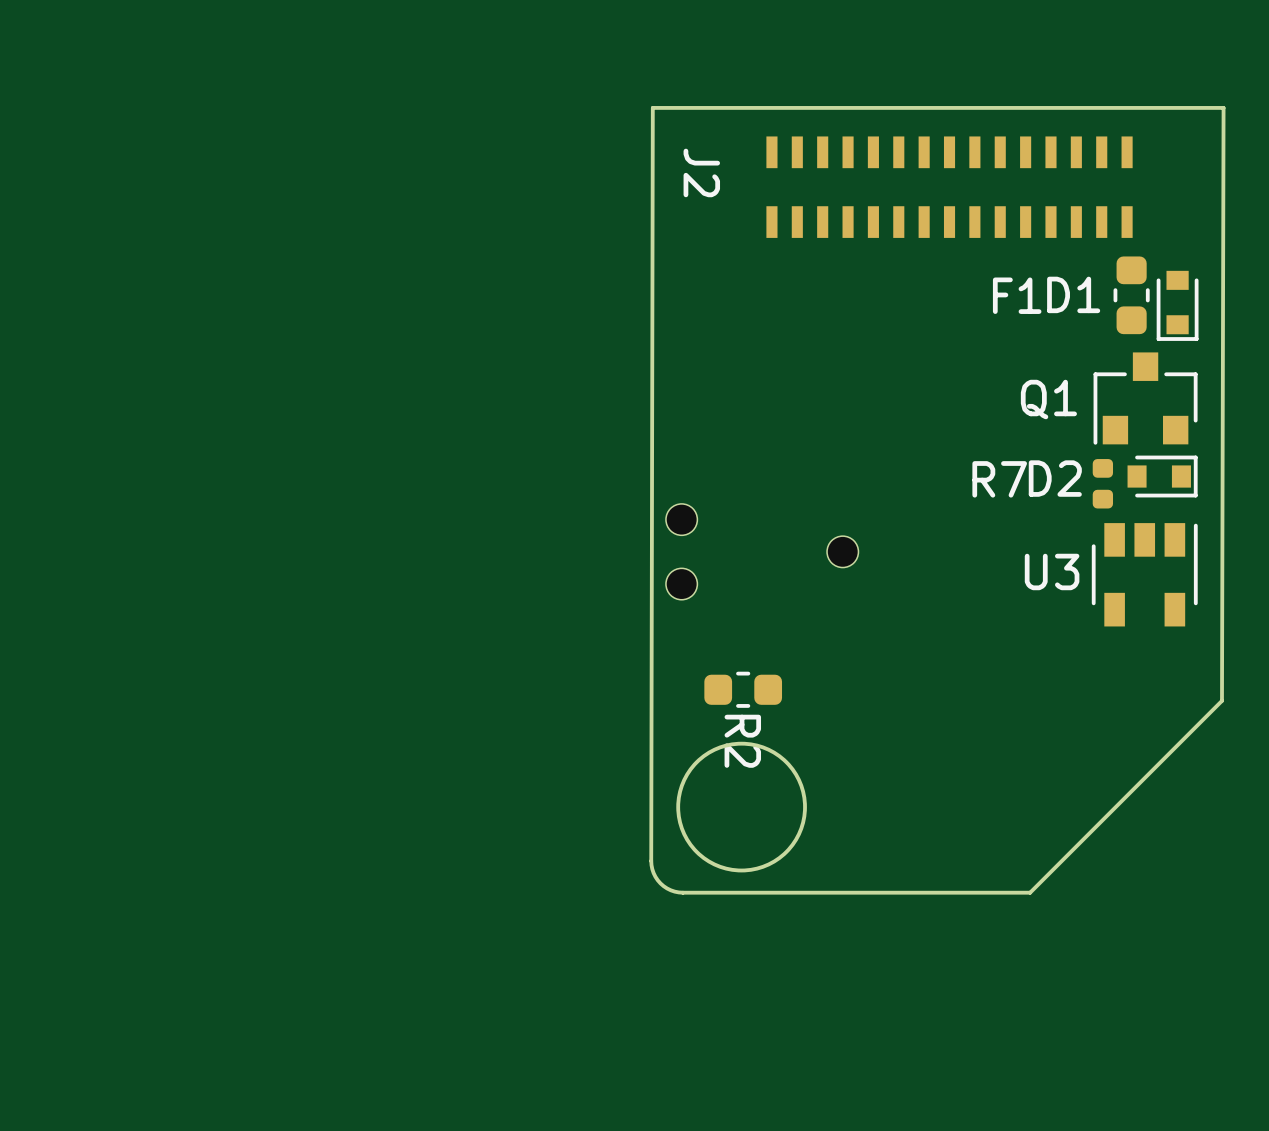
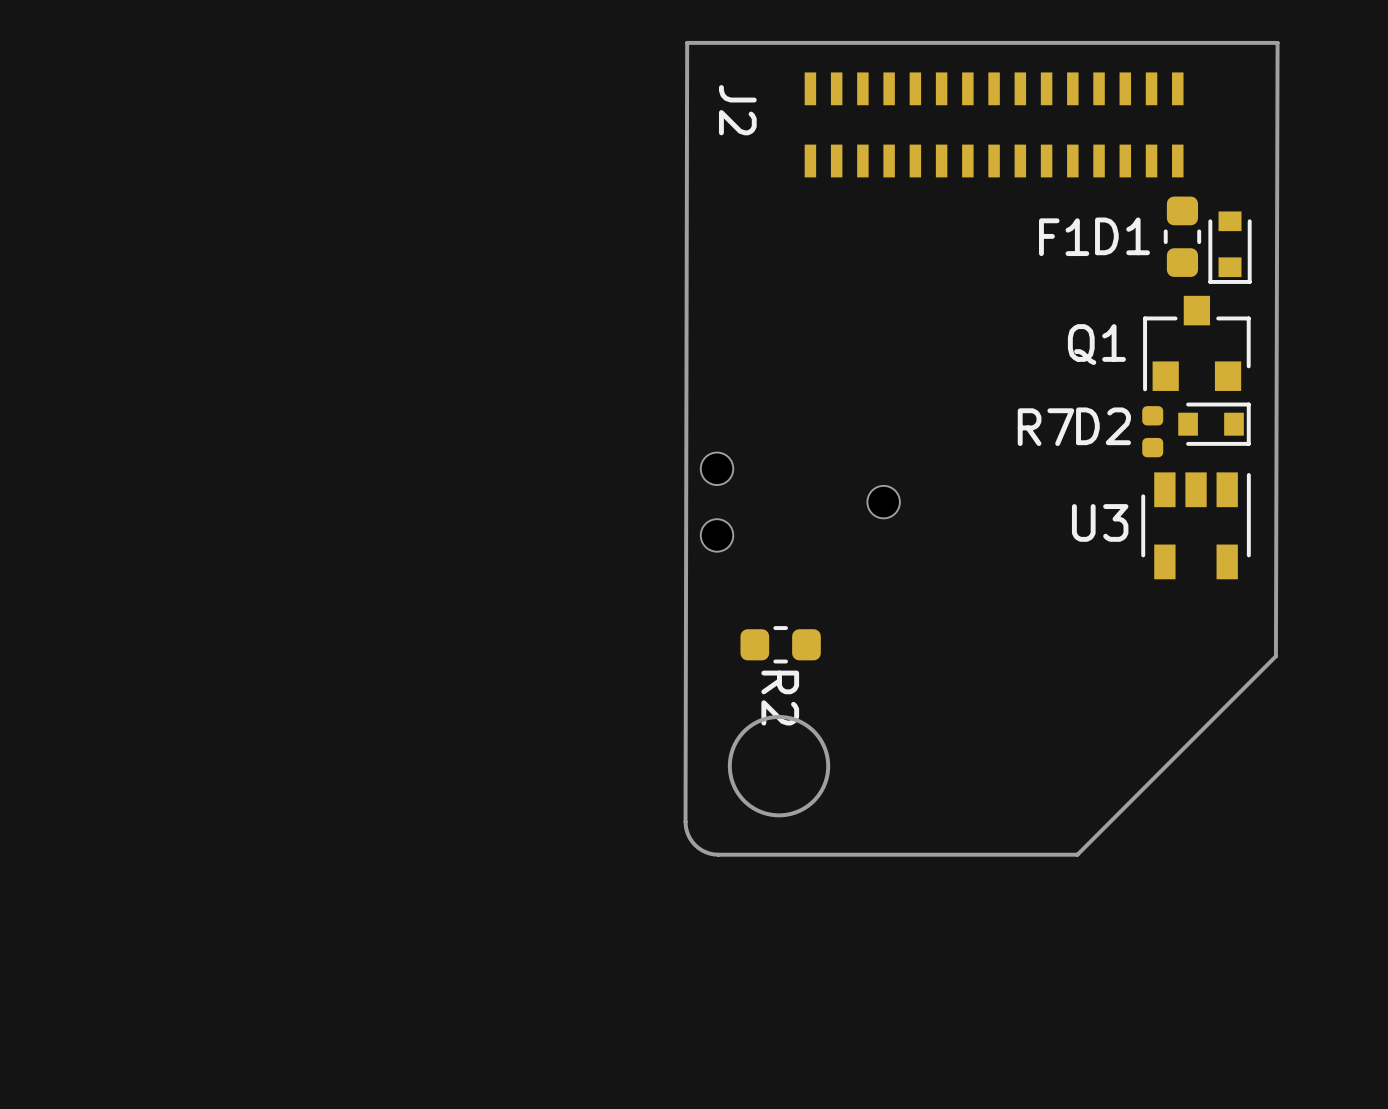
round board edge size: [676, 741, 807, 873] -> [727, 714, 831, 818]

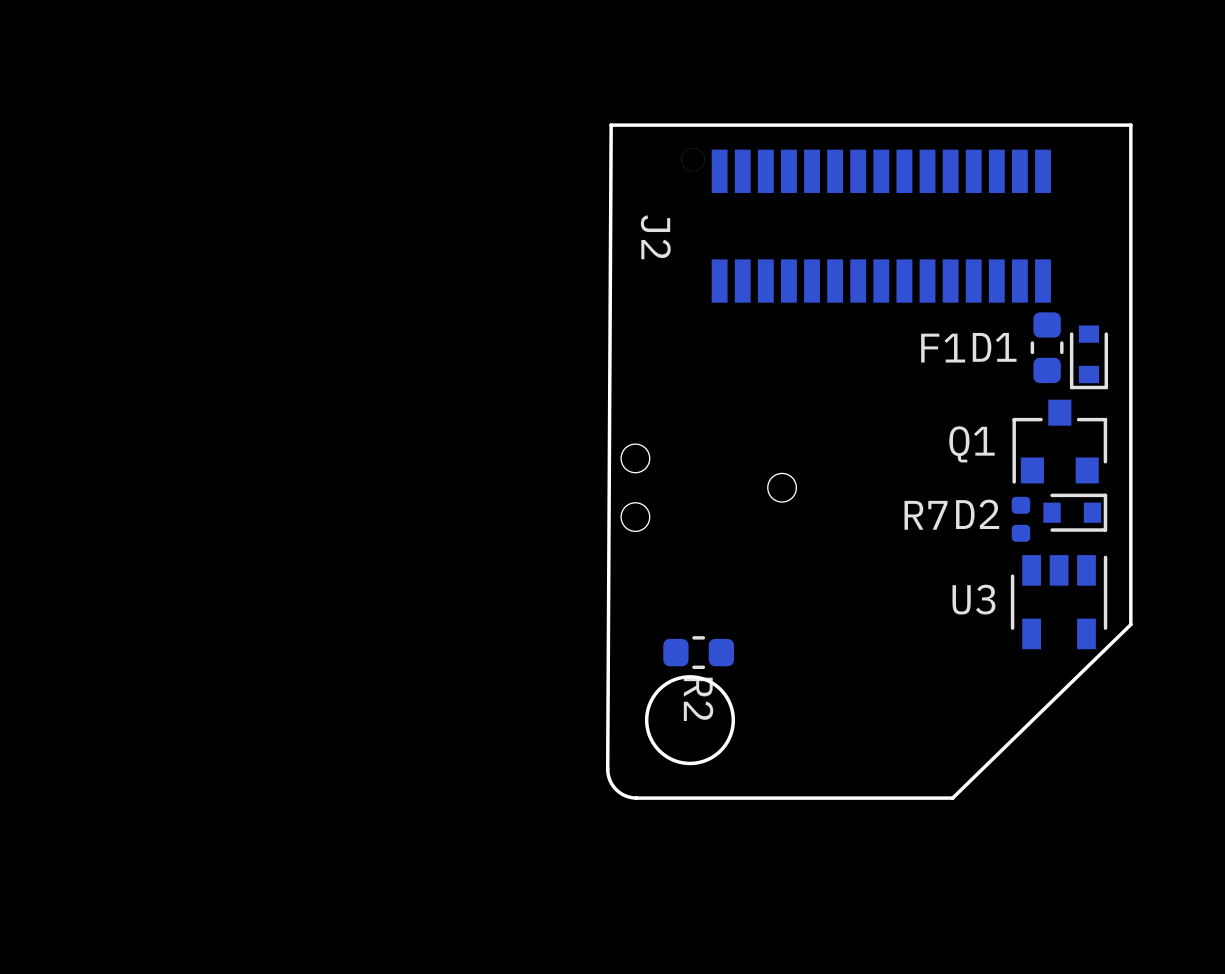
J2 footprint: [804, 72, 1184, 178] -> [681, 148, 1051, 303]
F1 position: (1182, 236) -> (1047, 347)
D1 position: (1230, 247) -> (1088, 357)
Q1 position: (1196, 343) -> (1059, 441)
D2 position: (1214, 424) -> (1075, 512)
R7 position: (1152, 431) -> (1020, 519)
U3 position: (1196, 525) -> (1059, 602)
R2 position: (780, 644) -> (698, 652)
board edge: (685, 821) (687, 42) (1277, 42) (1275, 656) (1077, 854) -> (607, 769) (611, 125) (1130, 125) (1130, 624) (952, 798)

